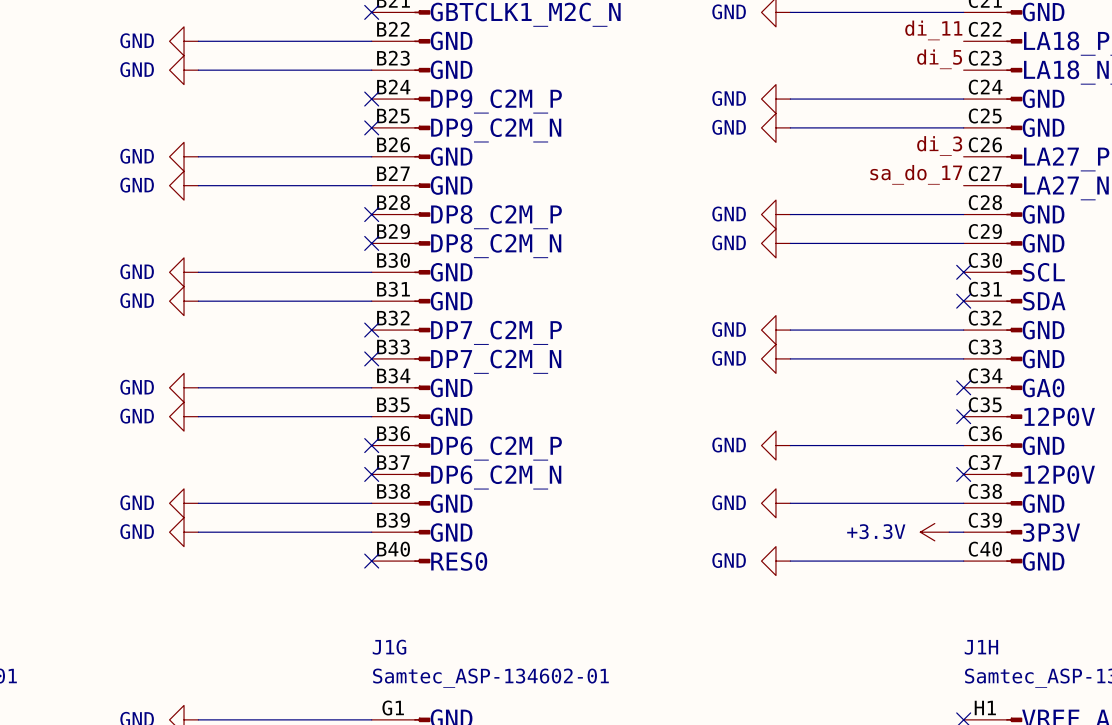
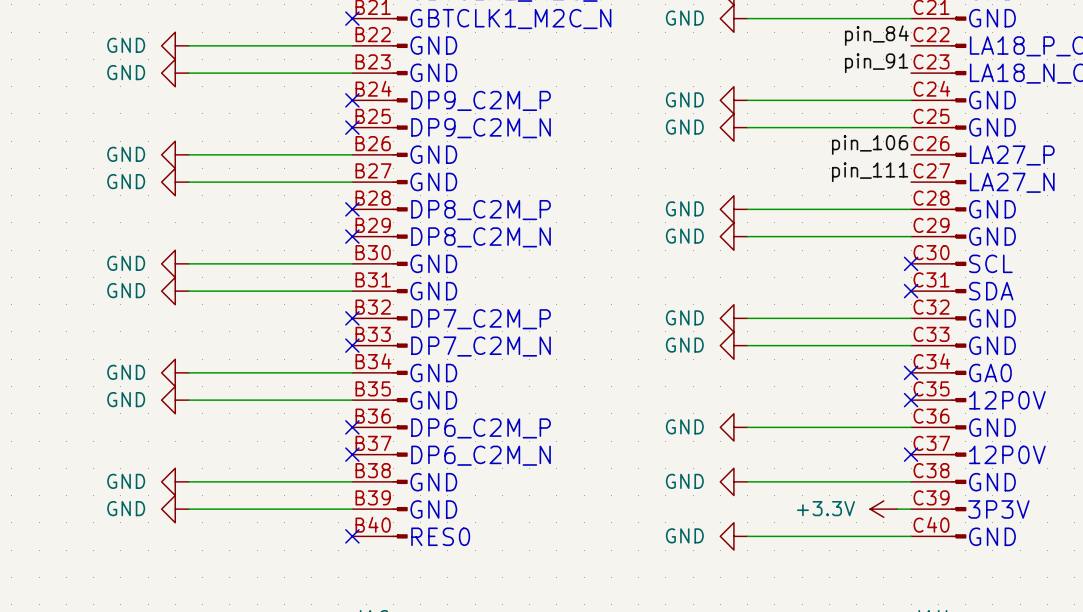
label: di_11 (933, 30) -> pin_84 (876, 35)
label: di_5 (939, 59) -> pin_91 (876, 63)
label: di_3 (939, 145) -> pin_106 (870, 144)
label: sa_do_17 (916, 174) -> pin_111 (870, 172)

